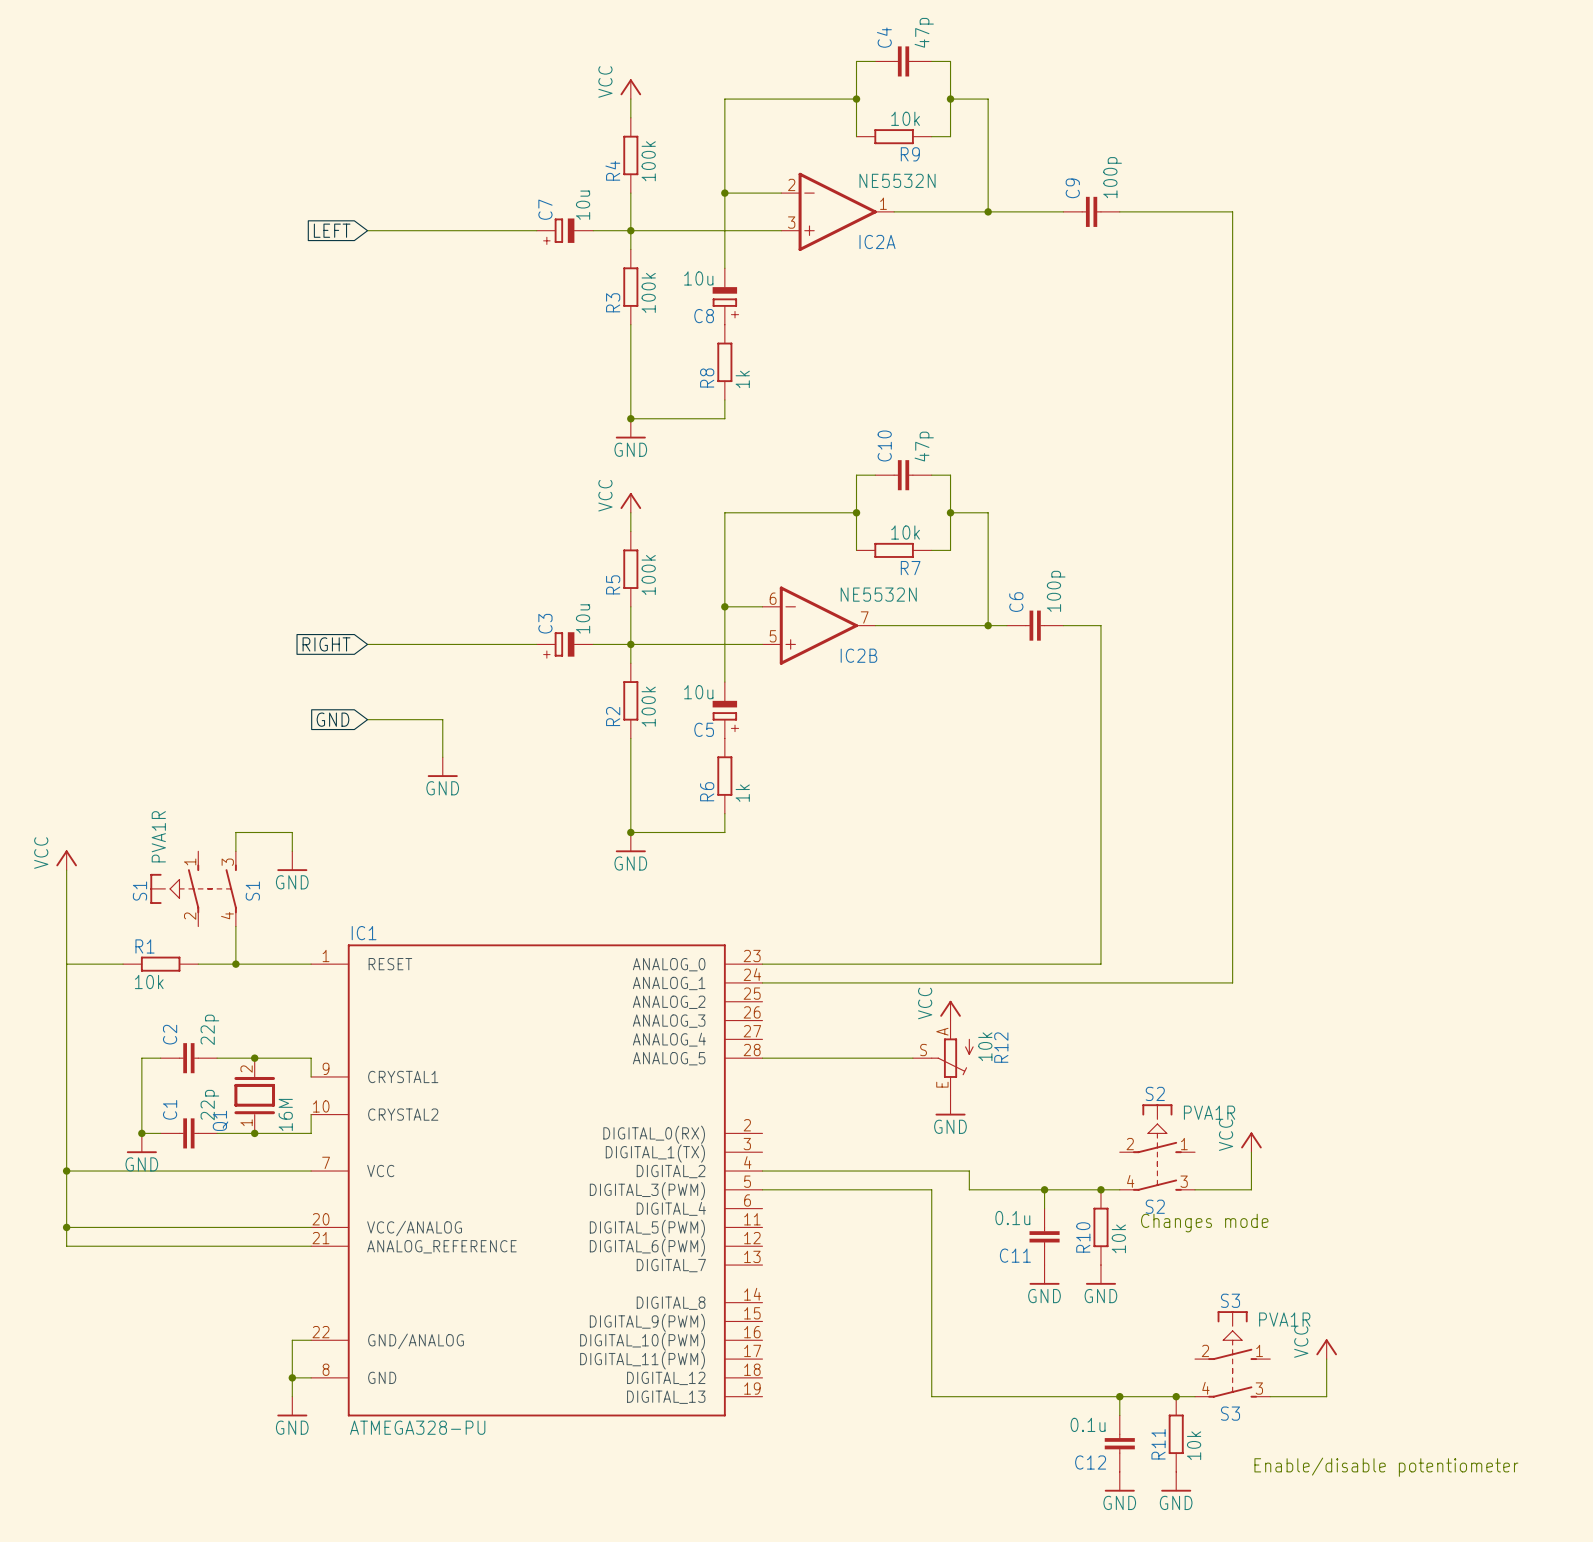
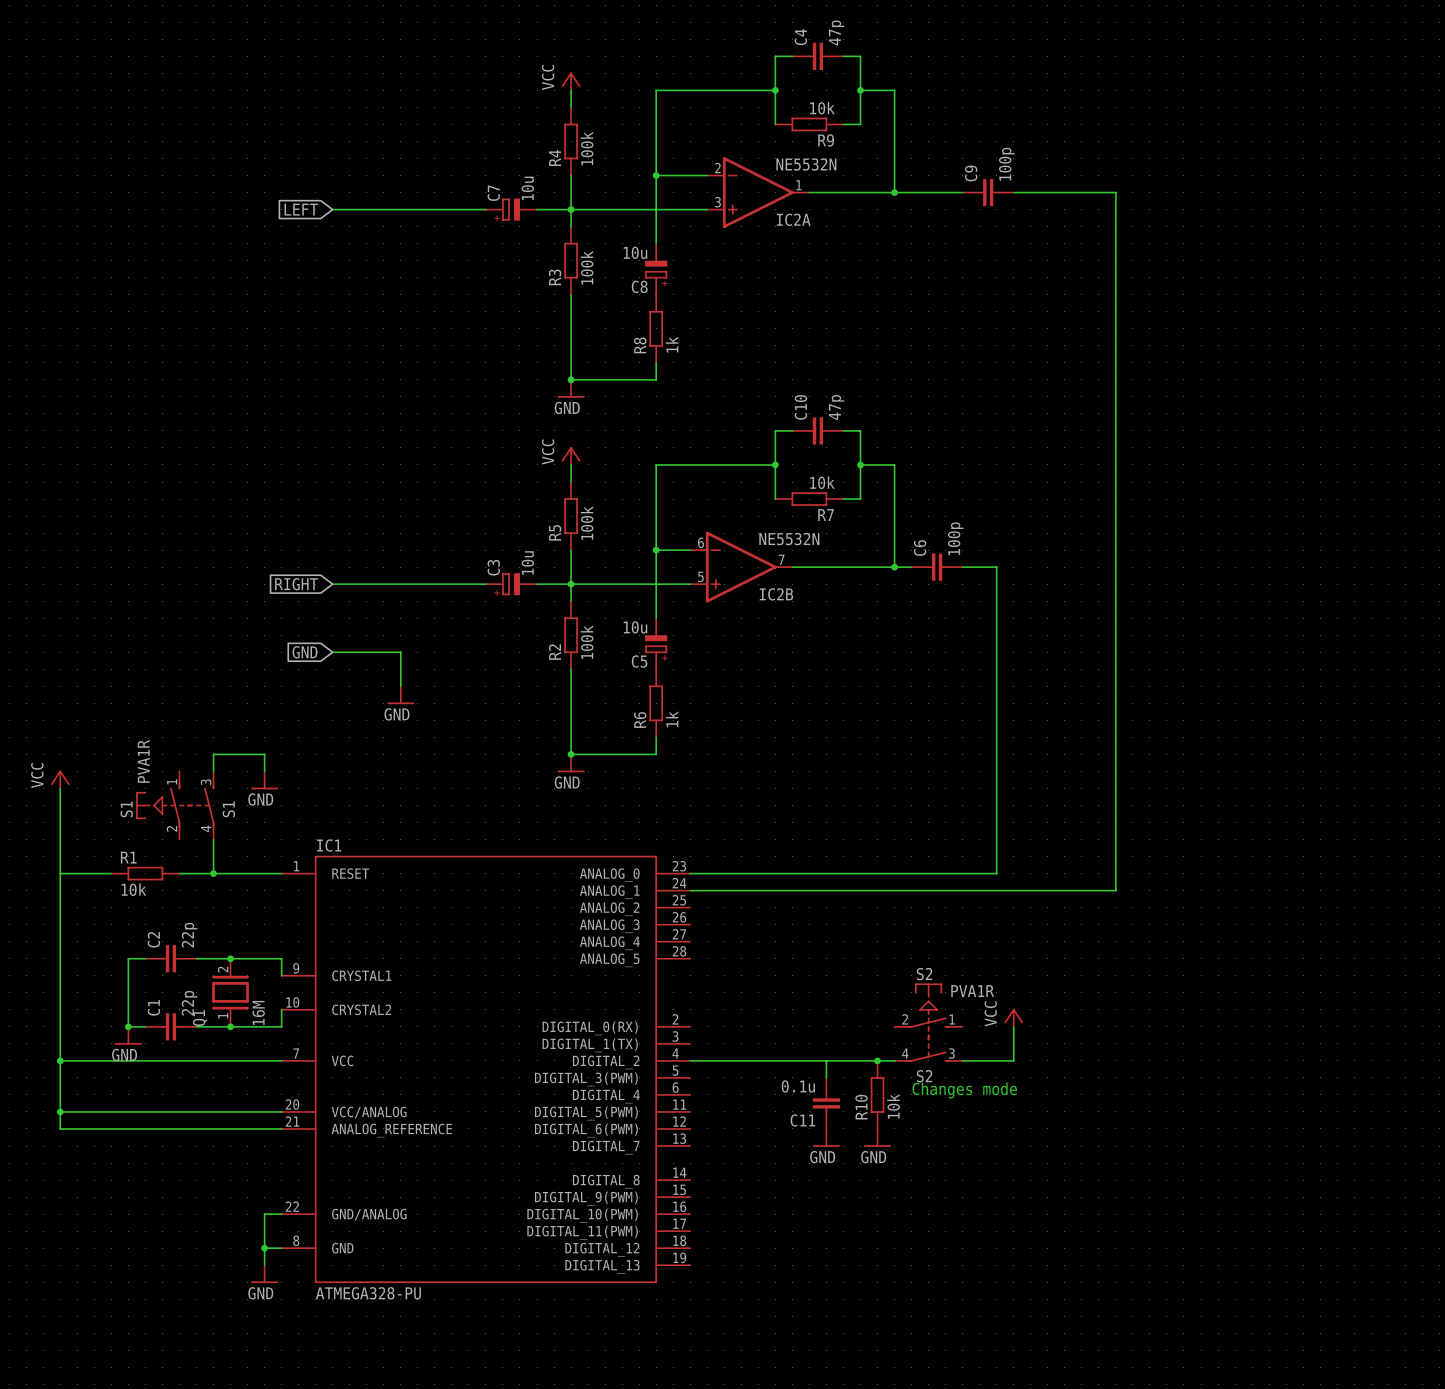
power symbol: VCC (950, 1010) -> none
wire: (762, 1058) (912, 1058) -> none
R12: 10k (943, 1058) -> none
power symbol: GND (950, 1105) -> none
power symbol: none -> VCC (1013, 1017)
S2 position: (1157, 1135) -> (928, 1011)
power symbol: VCC (1251, 1142) -> none
wire: (1251, 1152) (1251, 1189) (1195, 1189) -> (1013, 1026) (1013, 1060) (962, 1060)
wire: (969, 1171) (969, 1189) (1119, 1189) -> (877, 1060) (894, 1060)
junction: none -> (877, 1060)
S2 position: (1157, 1175) -> (928, 1048)
wire: (762, 1189) (931, 1189) (931, 1396) (1195, 1396) -> none
wire: (1044, 1189) (1044, 1208) -> (826, 1060) (826, 1077)
junction: (1044, 1189) -> none
junction: (1100, 1189) -> none
text position: Changes mode (1204, 1223) -> Changes mode (964, 1090)
R10 position: (1100, 1227) -> (877, 1094)
C11 position: (1044, 1236) -> (826, 1103)
power symbol: none -> GND (826, 1137)
power symbol: none -> GND (877, 1137)
power symbol: GND (1044, 1274) -> none
power symbol: GND (1100, 1274) -> none
S3: PVA1R (1232, 1342) -> none
power symbol: VCC (1326, 1349) -> none
wire: (1326, 1359) (1326, 1396) (1270, 1396) -> none
S3: (1232, 1382) -> none
wire: (1119, 1396) (1119, 1415) -> none
junction: (1119, 1396) -> none
junction: (1176, 1396) -> none
R11: 10k (1176, 1434) -> none
C12: 0.1u (1119, 1443) -> none
text: Enable/disable potentiometer (1386, 1467) -> none
power symbol: GND (1119, 1481) -> none
power symbol: GND (1176, 1481) -> none

